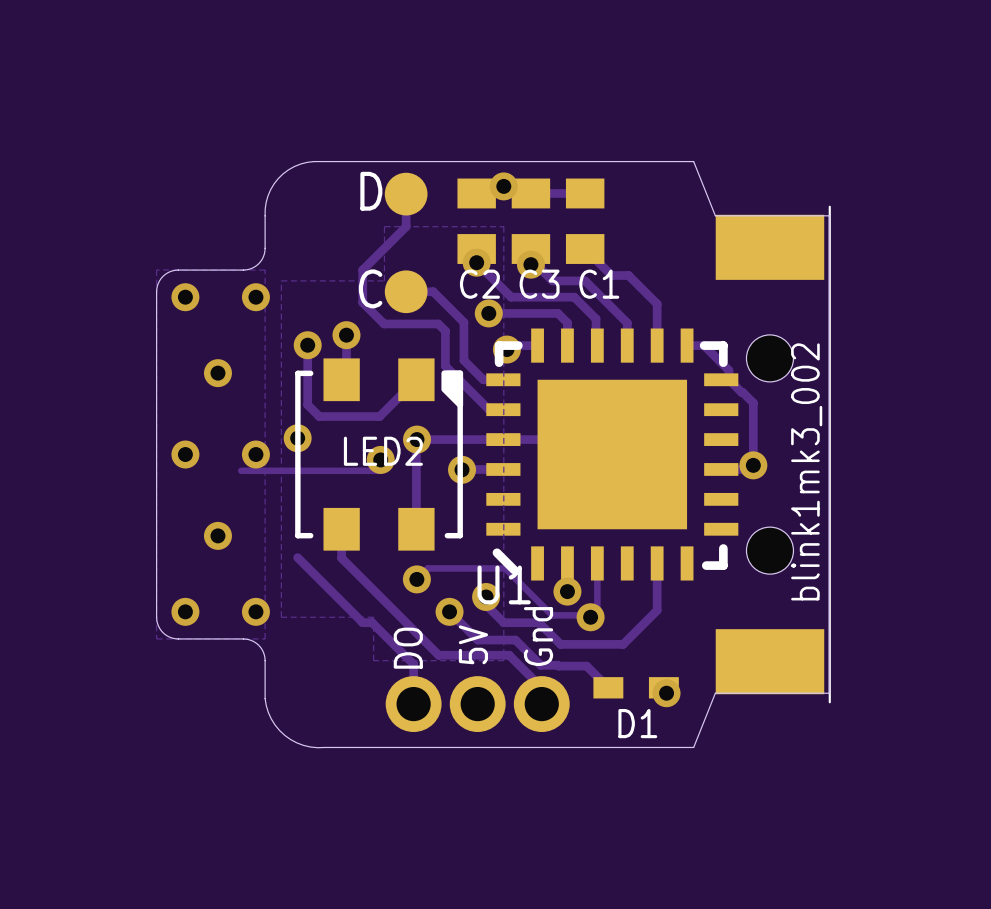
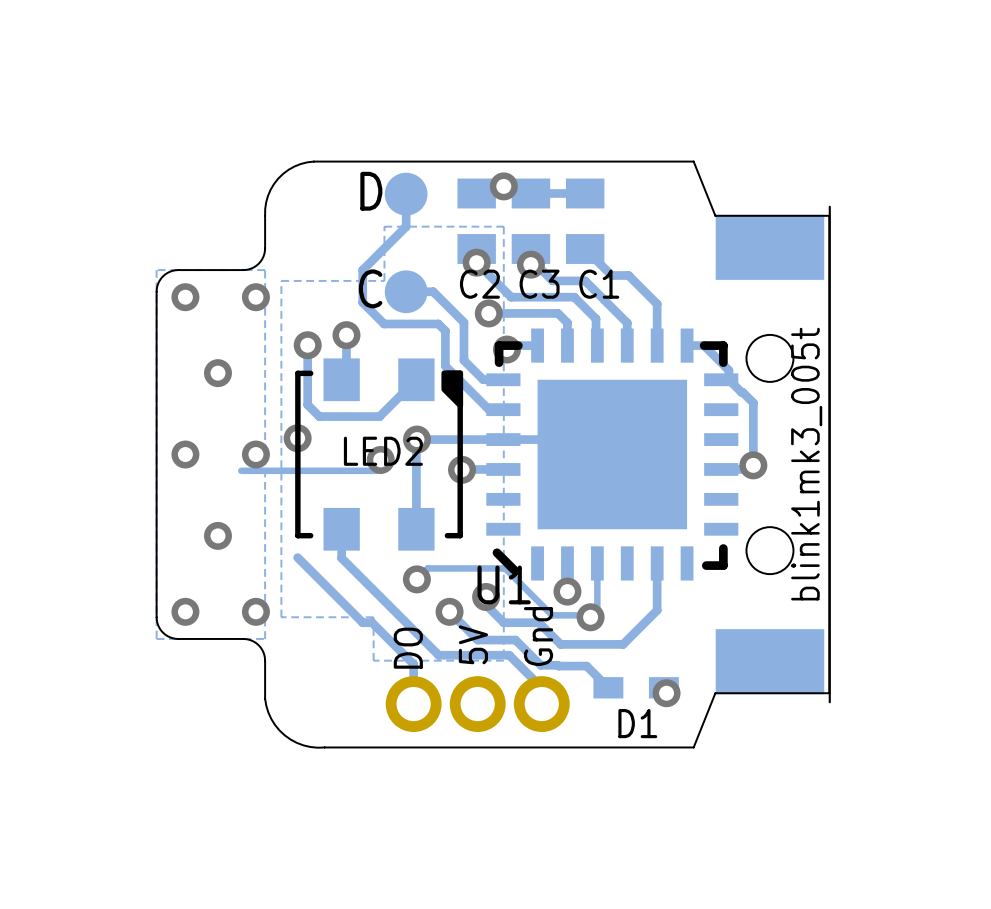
text: blink1mk3_002 (806, 471) -> blink1mk3_005t (806, 464)

